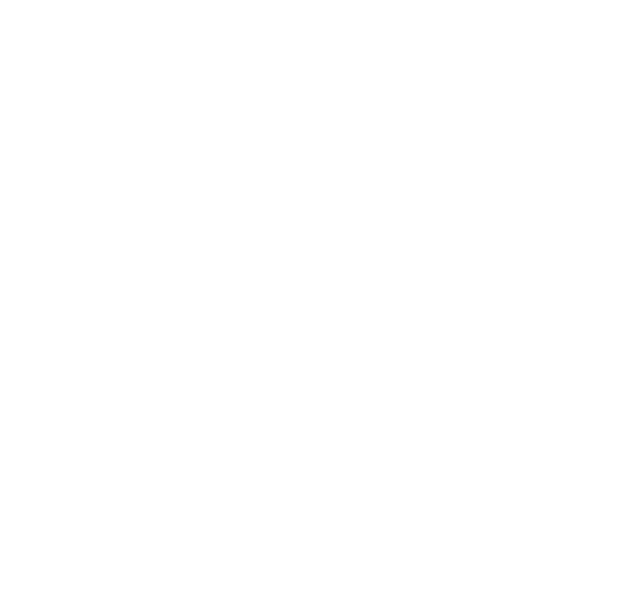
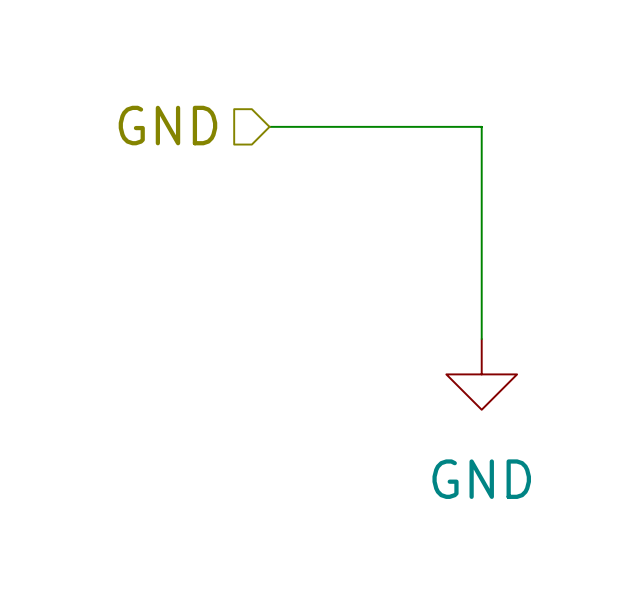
hierarchical label: none -> GND (167, 125)
wire: none -> (269, 126) (481, 126) (481, 339)
power symbol: none -> GND (481, 374)

